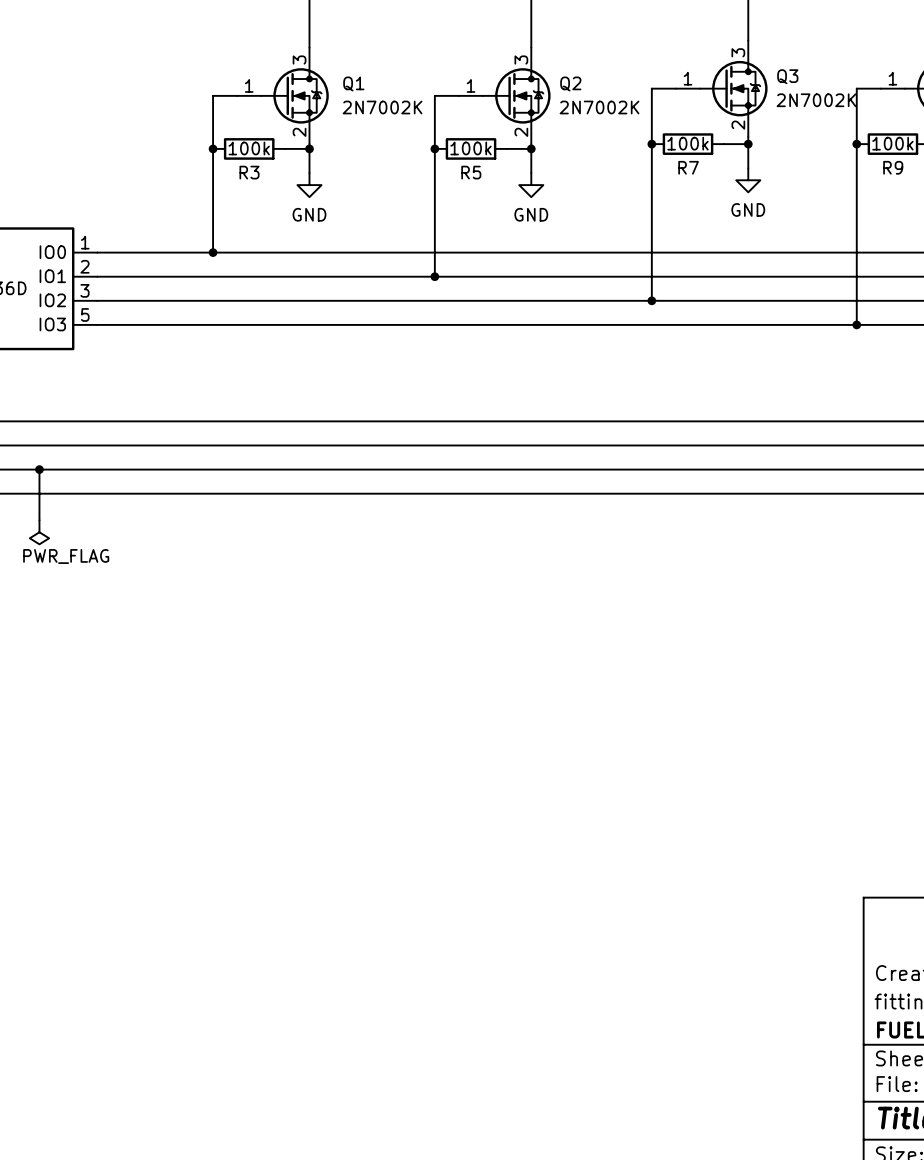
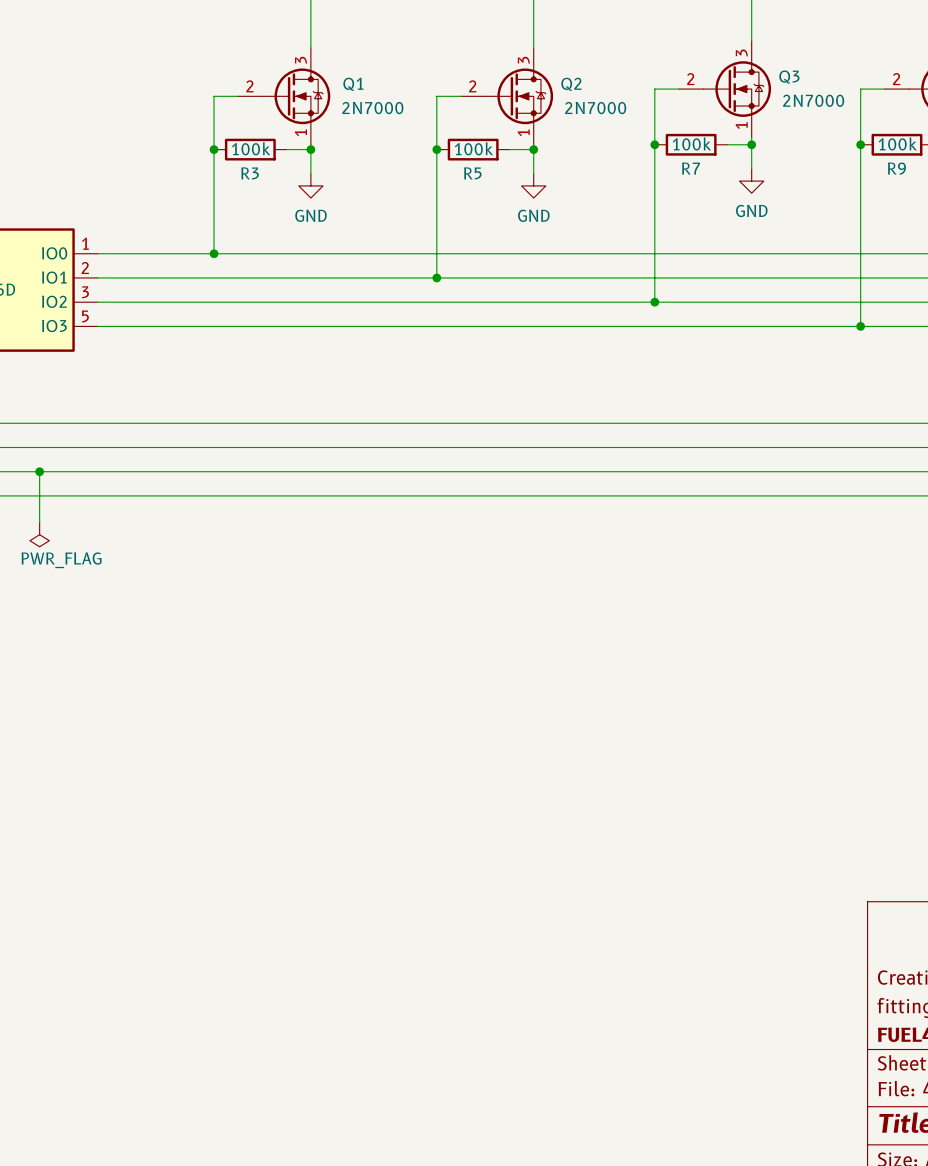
Q3 pin number: 1 (688, 78) -> 2 (690, 79)
part pin number: 1 (892, 78) -> 2 (896, 79)
Q1 pin number: 1 (249, 85) -> 2 (249, 86)
Q2 pin number: 1 (471, 85) -> 2 (472, 86)
Q3 value: 2N7002K (816, 100) -> 2N7000 (813, 100)
Q1 value: 2N7002K (382, 107) -> 2N7000 (372, 108)
Q2 value: 2N7002K (599, 107) -> 2N7000 (595, 108)
Q3 pin number: 2 (738, 125) -> 1 (741, 125)
Q1 pin number: 2 (299, 132) -> 1 (300, 132)
Q2 pin number: 2 (521, 132) -> 1 (523, 132)

